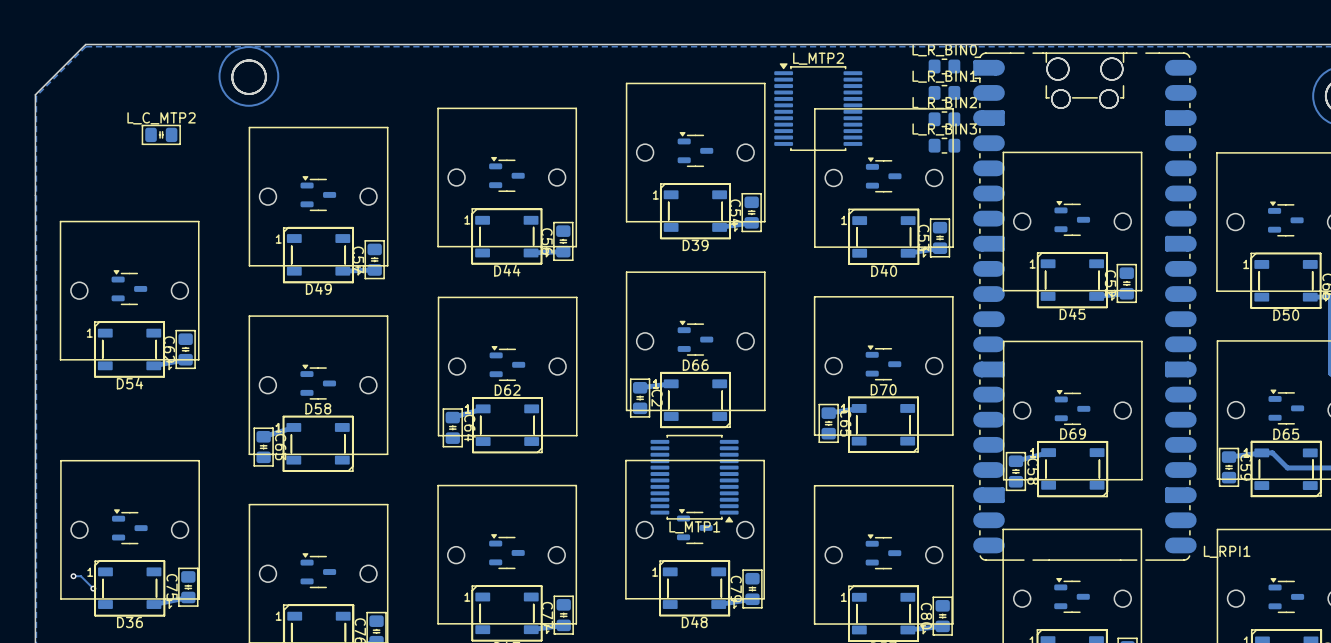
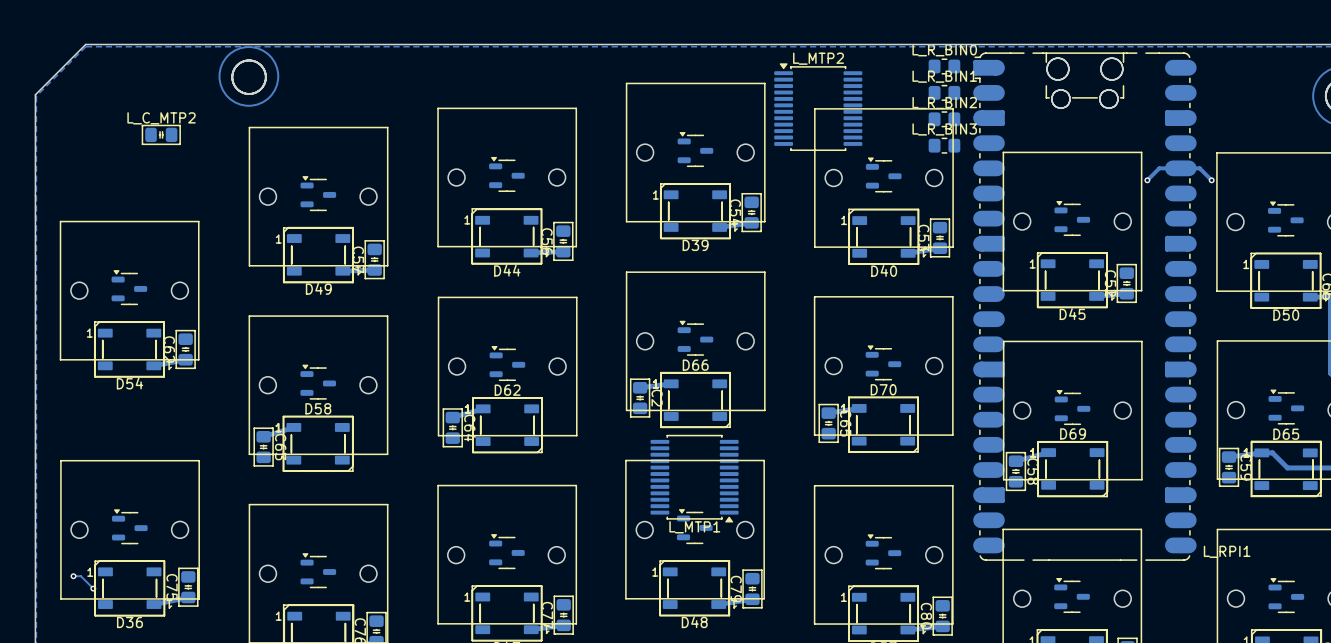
via: none -> (1147, 180)
track: none -> (1211, 180) (1199, 168) (1159, 168) (1147, 180)
via: none -> (1211, 180)

